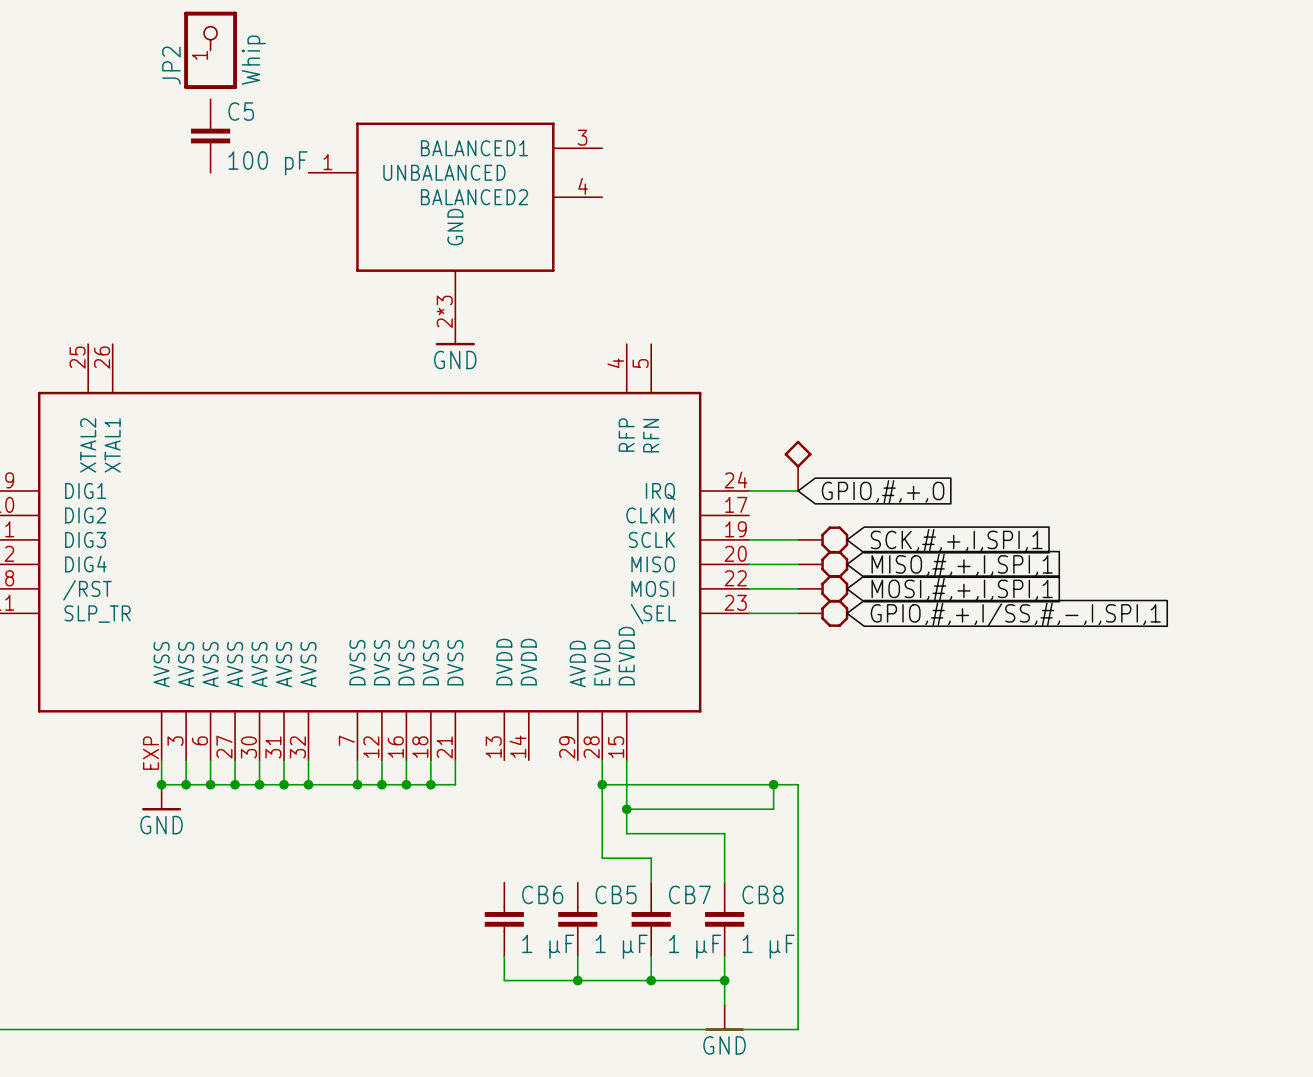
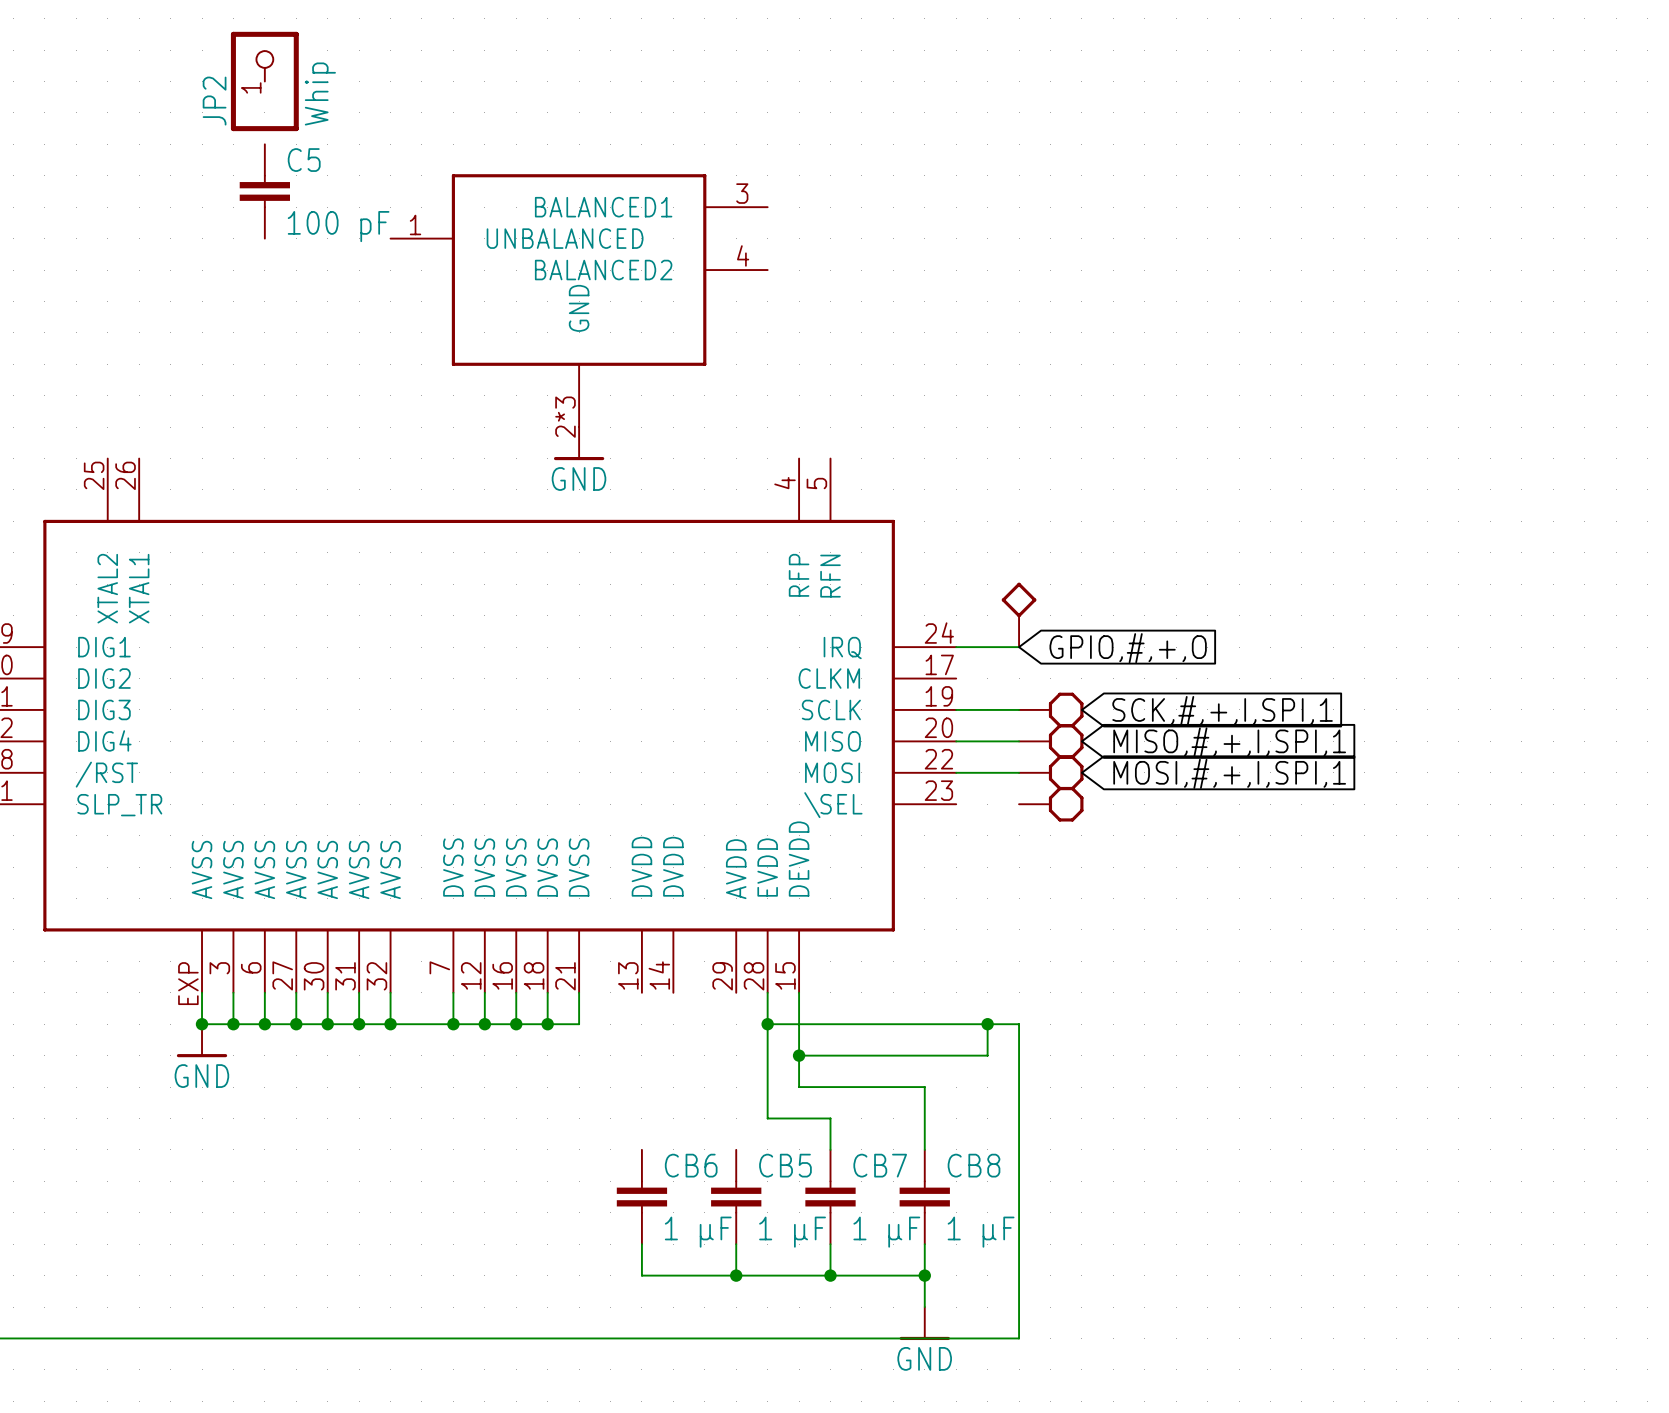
wire: (749, 613) (798, 613) -> none
global label: GPIO,#,+,I/SS,#,-,I,SPI,1 (1015, 614) -> none

